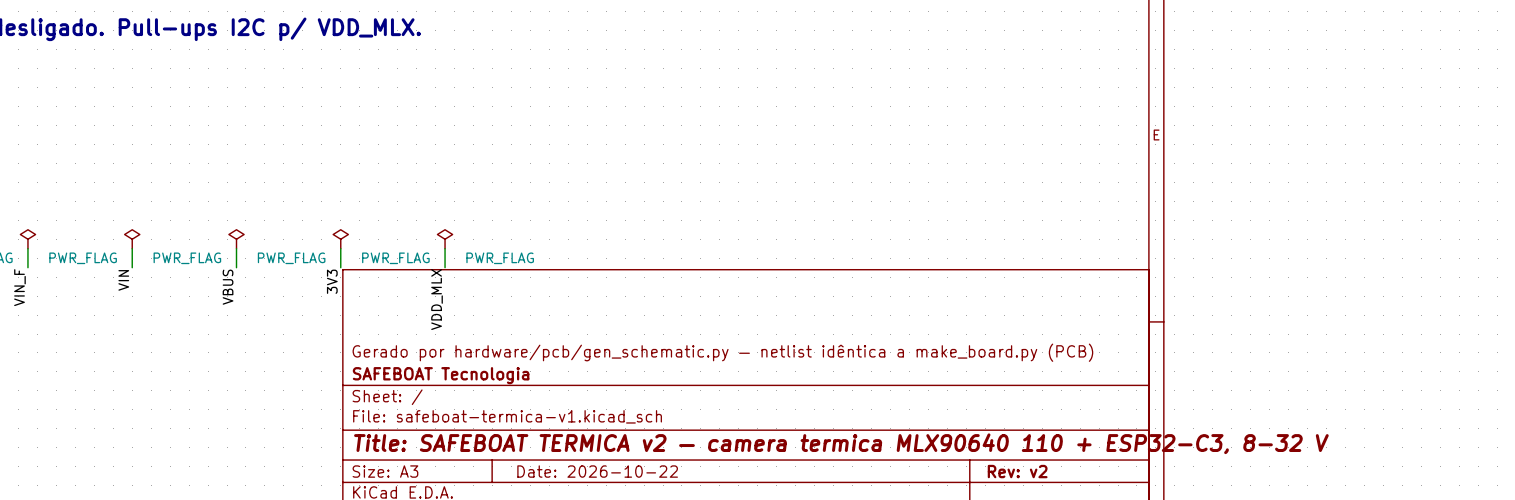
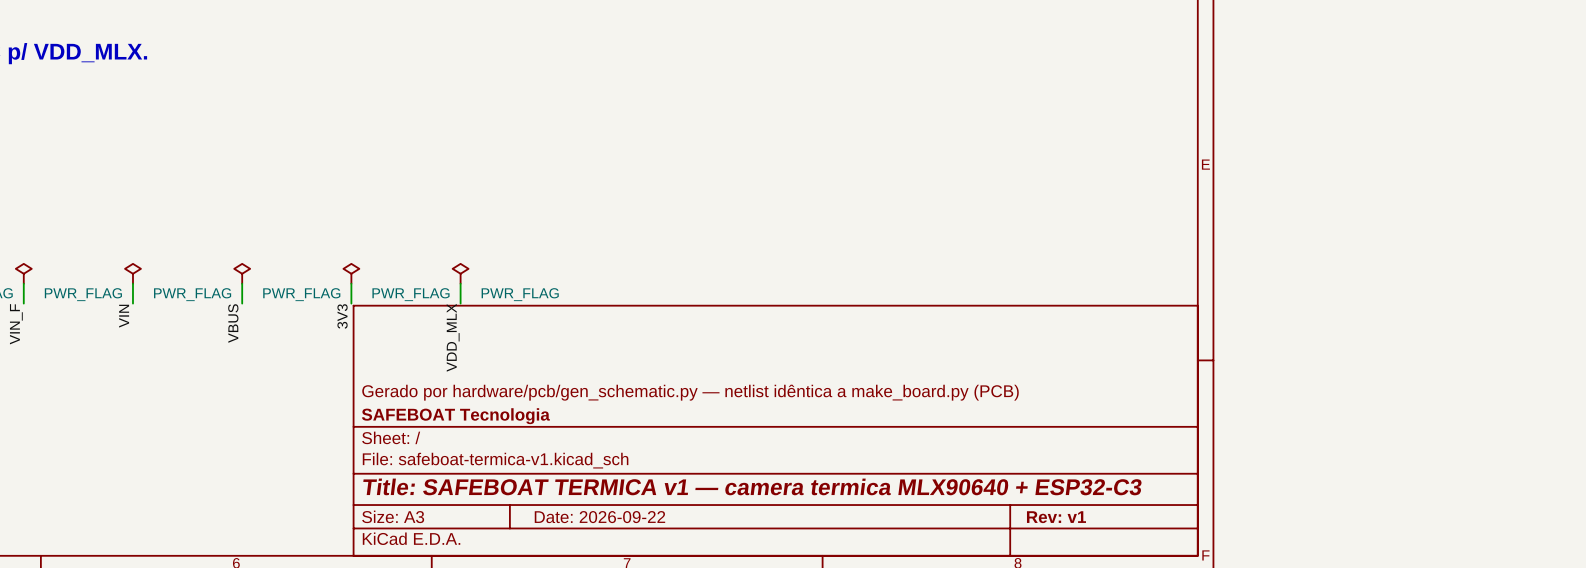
title block: Title: SAFEBOAT TERMICA v2 — camera termica MLX90640 110 + ESP32-C3, 8-32 V (841, 443) -> Title: SAFEBOAT TERMICA v1 — camera termica MLX90640 + ESP32-C3 (752, 486)
title block: Date: 2026-10-22 (597, 471) -> Date: 2026-09-22 (599, 517)
title block: Rev: v2 (1017, 471) -> Rev: v1 (1056, 517)

